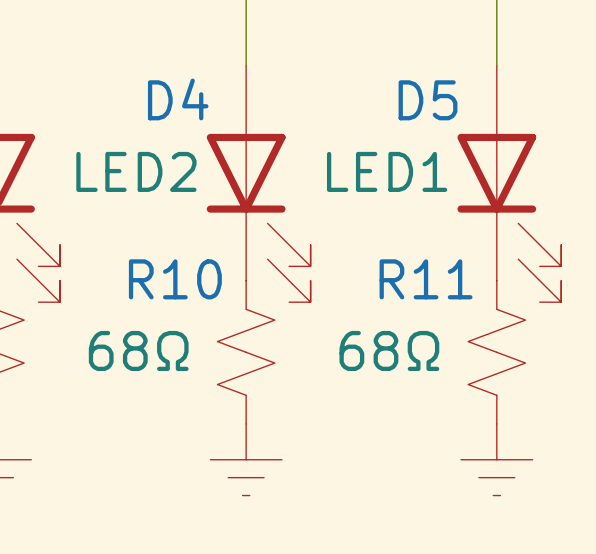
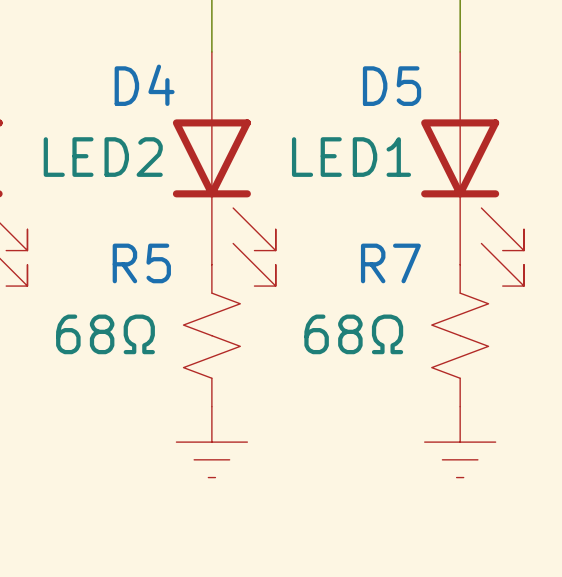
R10 name: R10 (175, 279) -> R5 (141, 263)
R11 name: R11 (426, 279) -> R7 (390, 263)

